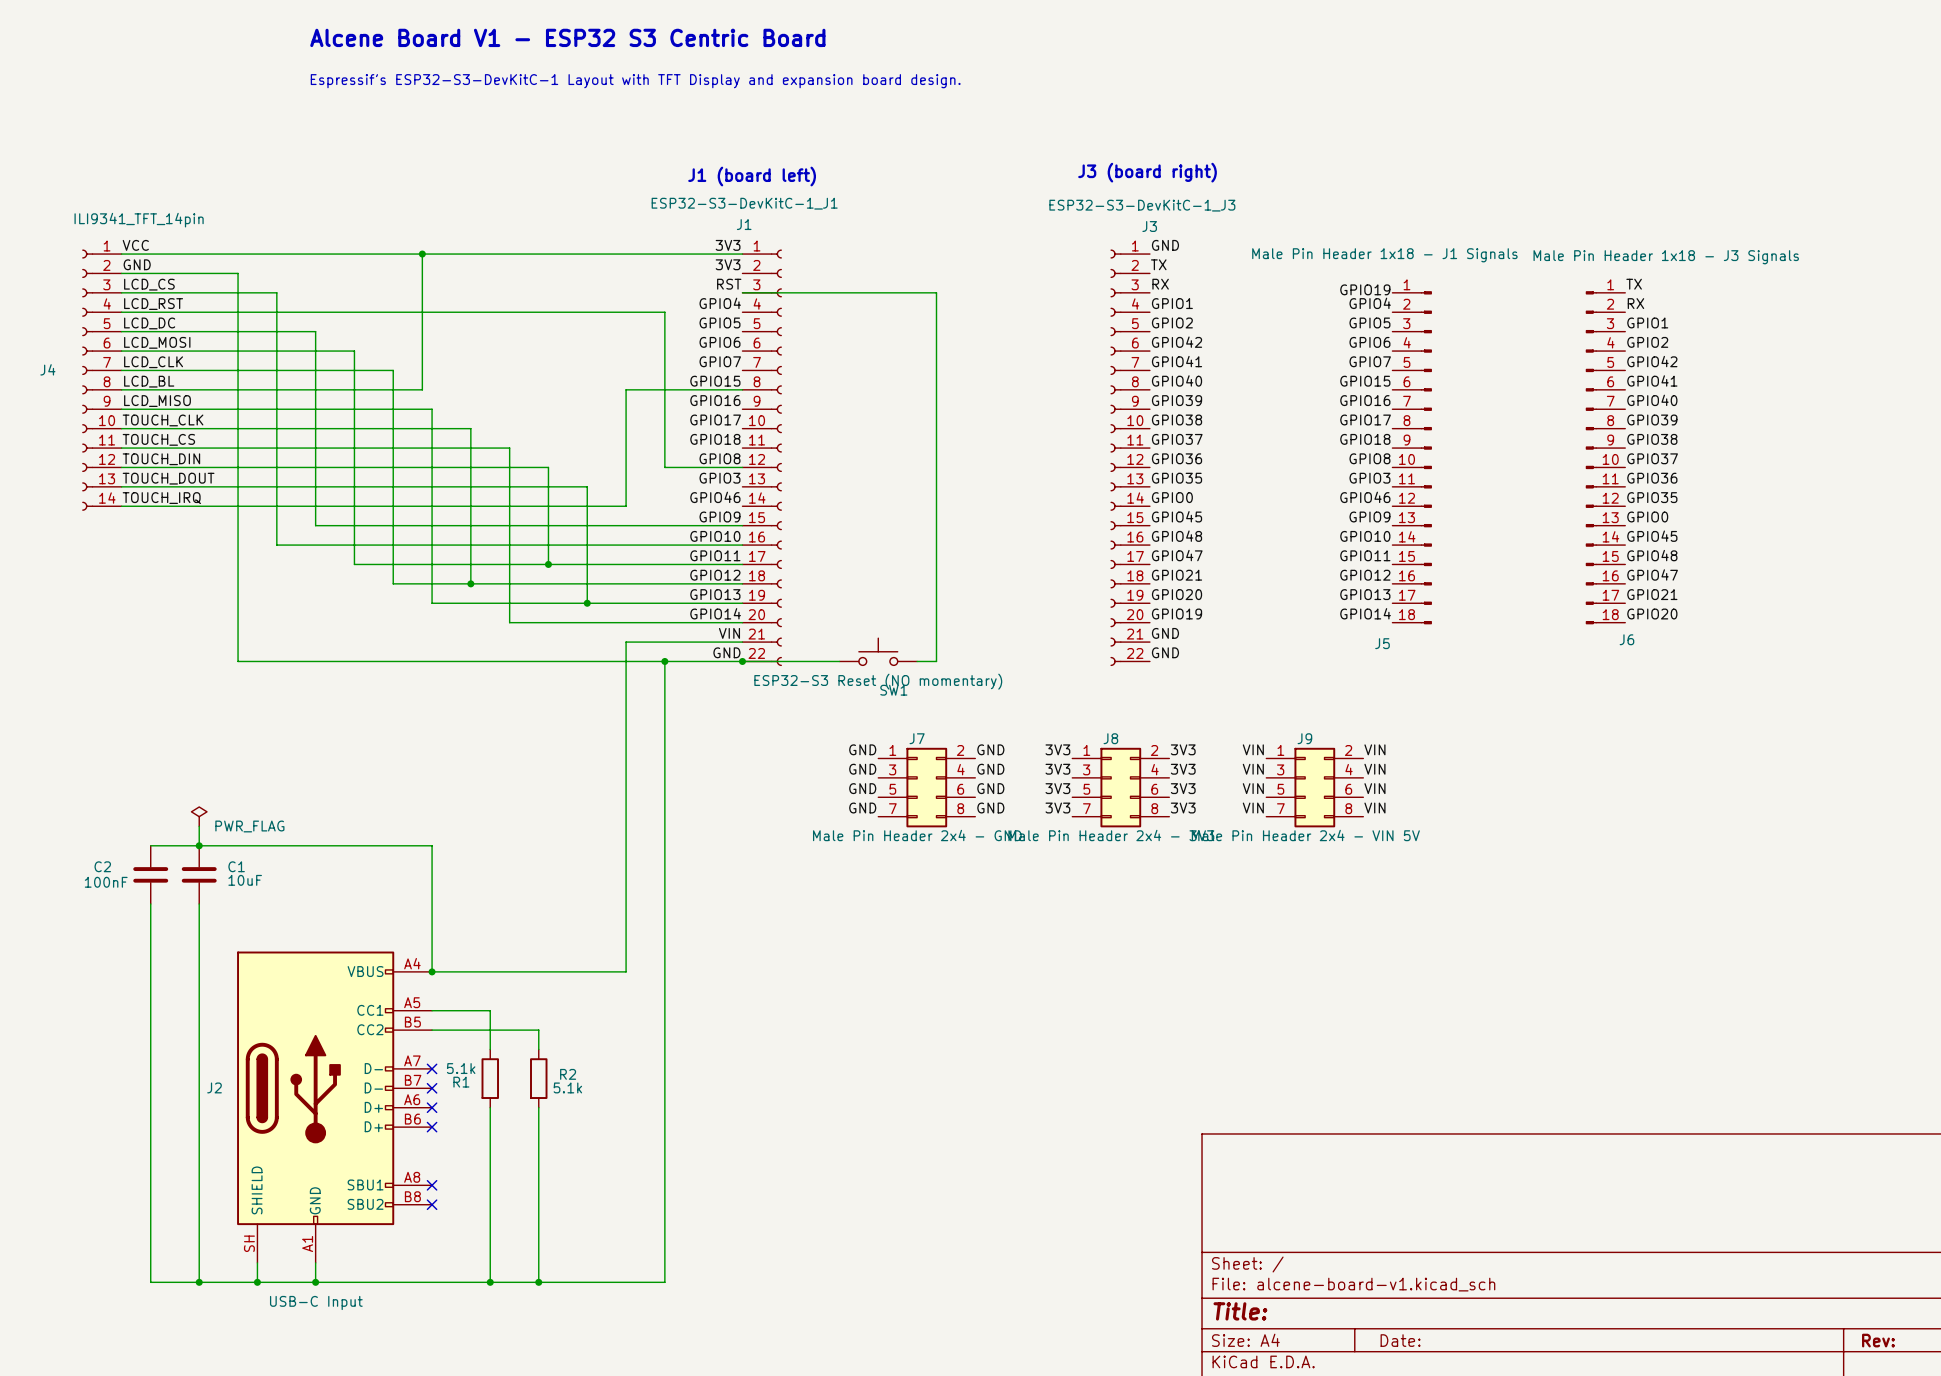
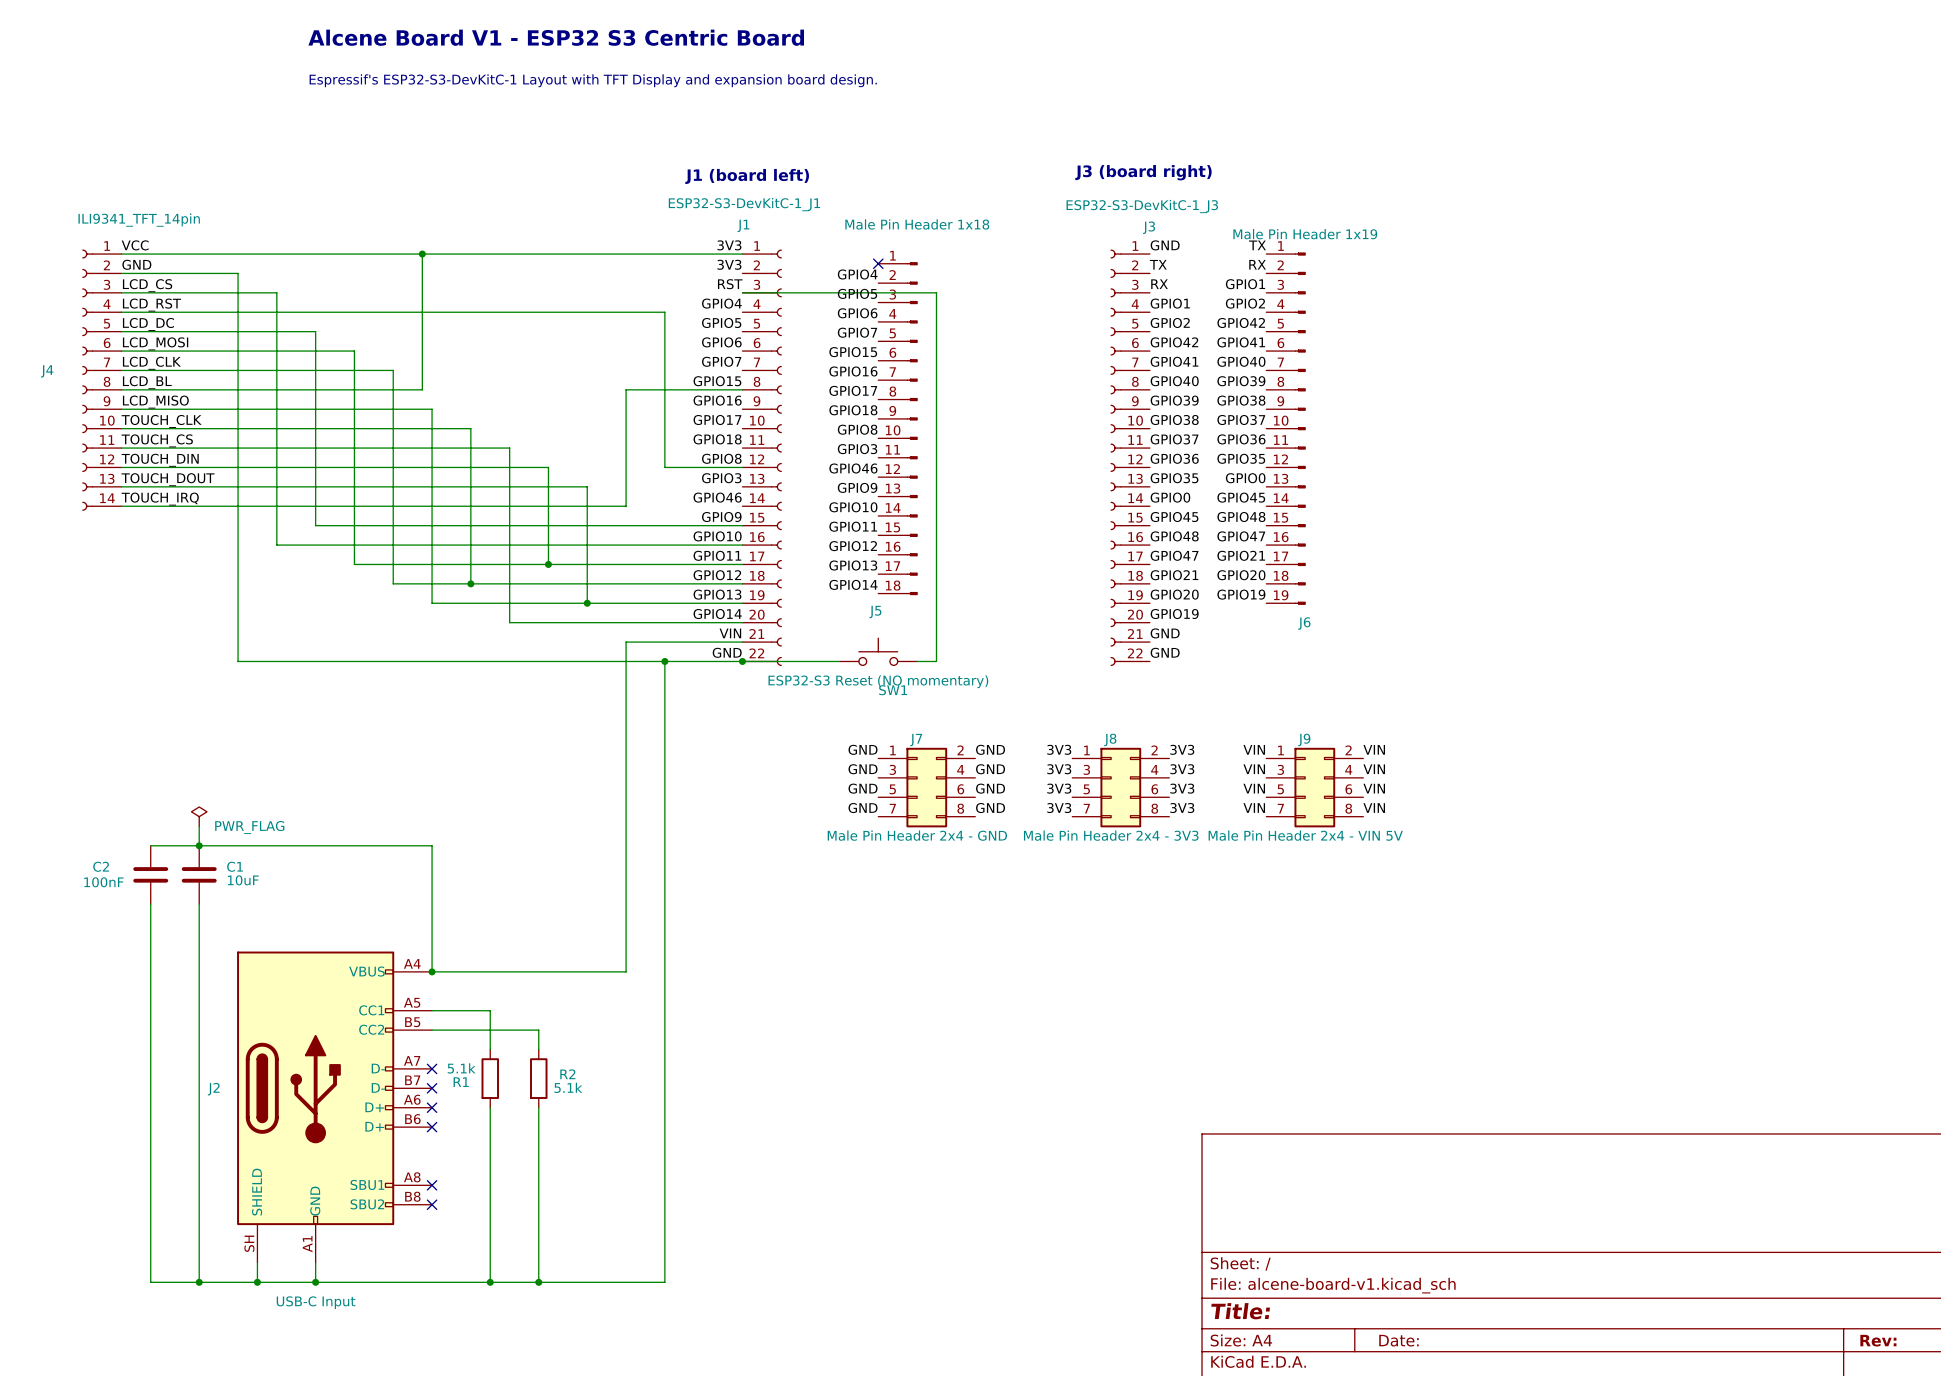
label: none -> TX (1257, 245)
J5 value: Male Pin Header 1x18 - J1 Signals (1384, 255) -> Male Pin Header 1x18 (917, 224)
J6 value: Male Pin Header 1x18 - J3 Signals (1666, 257) -> Male Pin Header 1x19 (1305, 234)
no-connect mark: none -> (878, 263)
label: none -> RX (1257, 264)
label: none -> GPIO4 (857, 274)
label: none -> GPIO1 (1245, 284)
label: TX (1634, 284) -> none
label: GPIO19 (1365, 289) -> none
J6 symbol: [1585, 291, 1626, 625] -> [1266, 252, 1306, 605]
label: none -> GPIO5 (857, 293)
label: none -> GPIO2 (1245, 303)
label: GPIO4 (1370, 303) -> none
label: RX (1635, 303) -> none
label: none -> GPIO6 (857, 313)
label: none -> GPIO42 (1241, 322)
label: GPIO5 (1369, 322) -> none
label: GPIO1 (1647, 322) -> none
label: none -> GPIO7 (857, 332)
label: none -> GPIO41 (1241, 342)
label: GPIO6 (1369, 342) -> none
label: GPIO2 (1647, 342) -> none
label: none -> GPIO15 (853, 352)
label: none -> GPIO40 (1241, 361)
label: GPIO7 (1370, 361) -> none
label: GPIO42 (1652, 361) -> none
label: none -> GPIO16 (853, 371)
label: GPIO41 (1652, 380) -> none
label: none -> GPIO39 (1241, 381)
label: GPIO15 (1365, 381) -> none
label: none -> GPIO17 (853, 390)
label: none -> GPIO38 (1241, 400)
label: GPIO16 (1365, 400) -> none
label: GPIO40 (1652, 400) -> none
label: none -> GPIO18 (853, 410)
label: none -> GPIO37 (1241, 420)
label: GPIO17 (1365, 419) -> none
label: GPIO39 (1652, 419) -> none
label: none -> GPIO8 (857, 429)
label: none -> GPIO36 (1241, 439)
label: GPIO18 (1365, 439) -> none
label: GPIO38 (1652, 439) -> none
label: none -> GPIO3 (857, 449)
J5 position: (1412, 457) -> (897, 428)
label: none -> GPIO35 (1241, 458)
label: GPIO8 (1369, 458) -> none
label: GPIO37 (1652, 458) -> none
label: none -> GPIO46 (853, 468)
label: none -> GPIO0 (1245, 478)
label: GPIO3 (1369, 478) -> none
label: GPIO36 (1652, 478) -> none
label: none -> GPIO9 (857, 487)
label: none -> GPIO45 (1241, 497)
label: GPIO46 (1365, 497) -> none
label: GPIO35 (1652, 497) -> none
label: none -> GPIO10 (853, 507)
label: none -> GPIO48 (1241, 517)
label: GPIO9 (1369, 517) -> none
label: GPIO0 (1647, 517) -> none
label: none -> GPIO11 (853, 526)
label: none -> GPIO47 (1241, 536)
label: GPIO10 (1365, 536) -> none
label: GPIO45 (1652, 536) -> none
label: none -> GPIO12 (853, 546)
label: none -> GPIO21 (1241, 555)
label: GPIO11 (1365, 555) -> none
label: GPIO48 (1652, 555) -> none
label: none -> GPIO13 (853, 565)
label: GPIO47 (1652, 574) -> none
label: none -> GPIO20 (1241, 575)
label: GPIO12 (1365, 575) -> none
label: none -> GPIO14 (853, 584)
label: none -> GPIO19 (1241, 594)
label: GPIO13 (1365, 594) -> none
label: GPIO21 (1652, 594) -> none
label: GPIO14 (1365, 613) -> none
label: GPIO20 (1652, 614) -> none
J5 name position: J5 (1382, 643) -> J5 (875, 611)

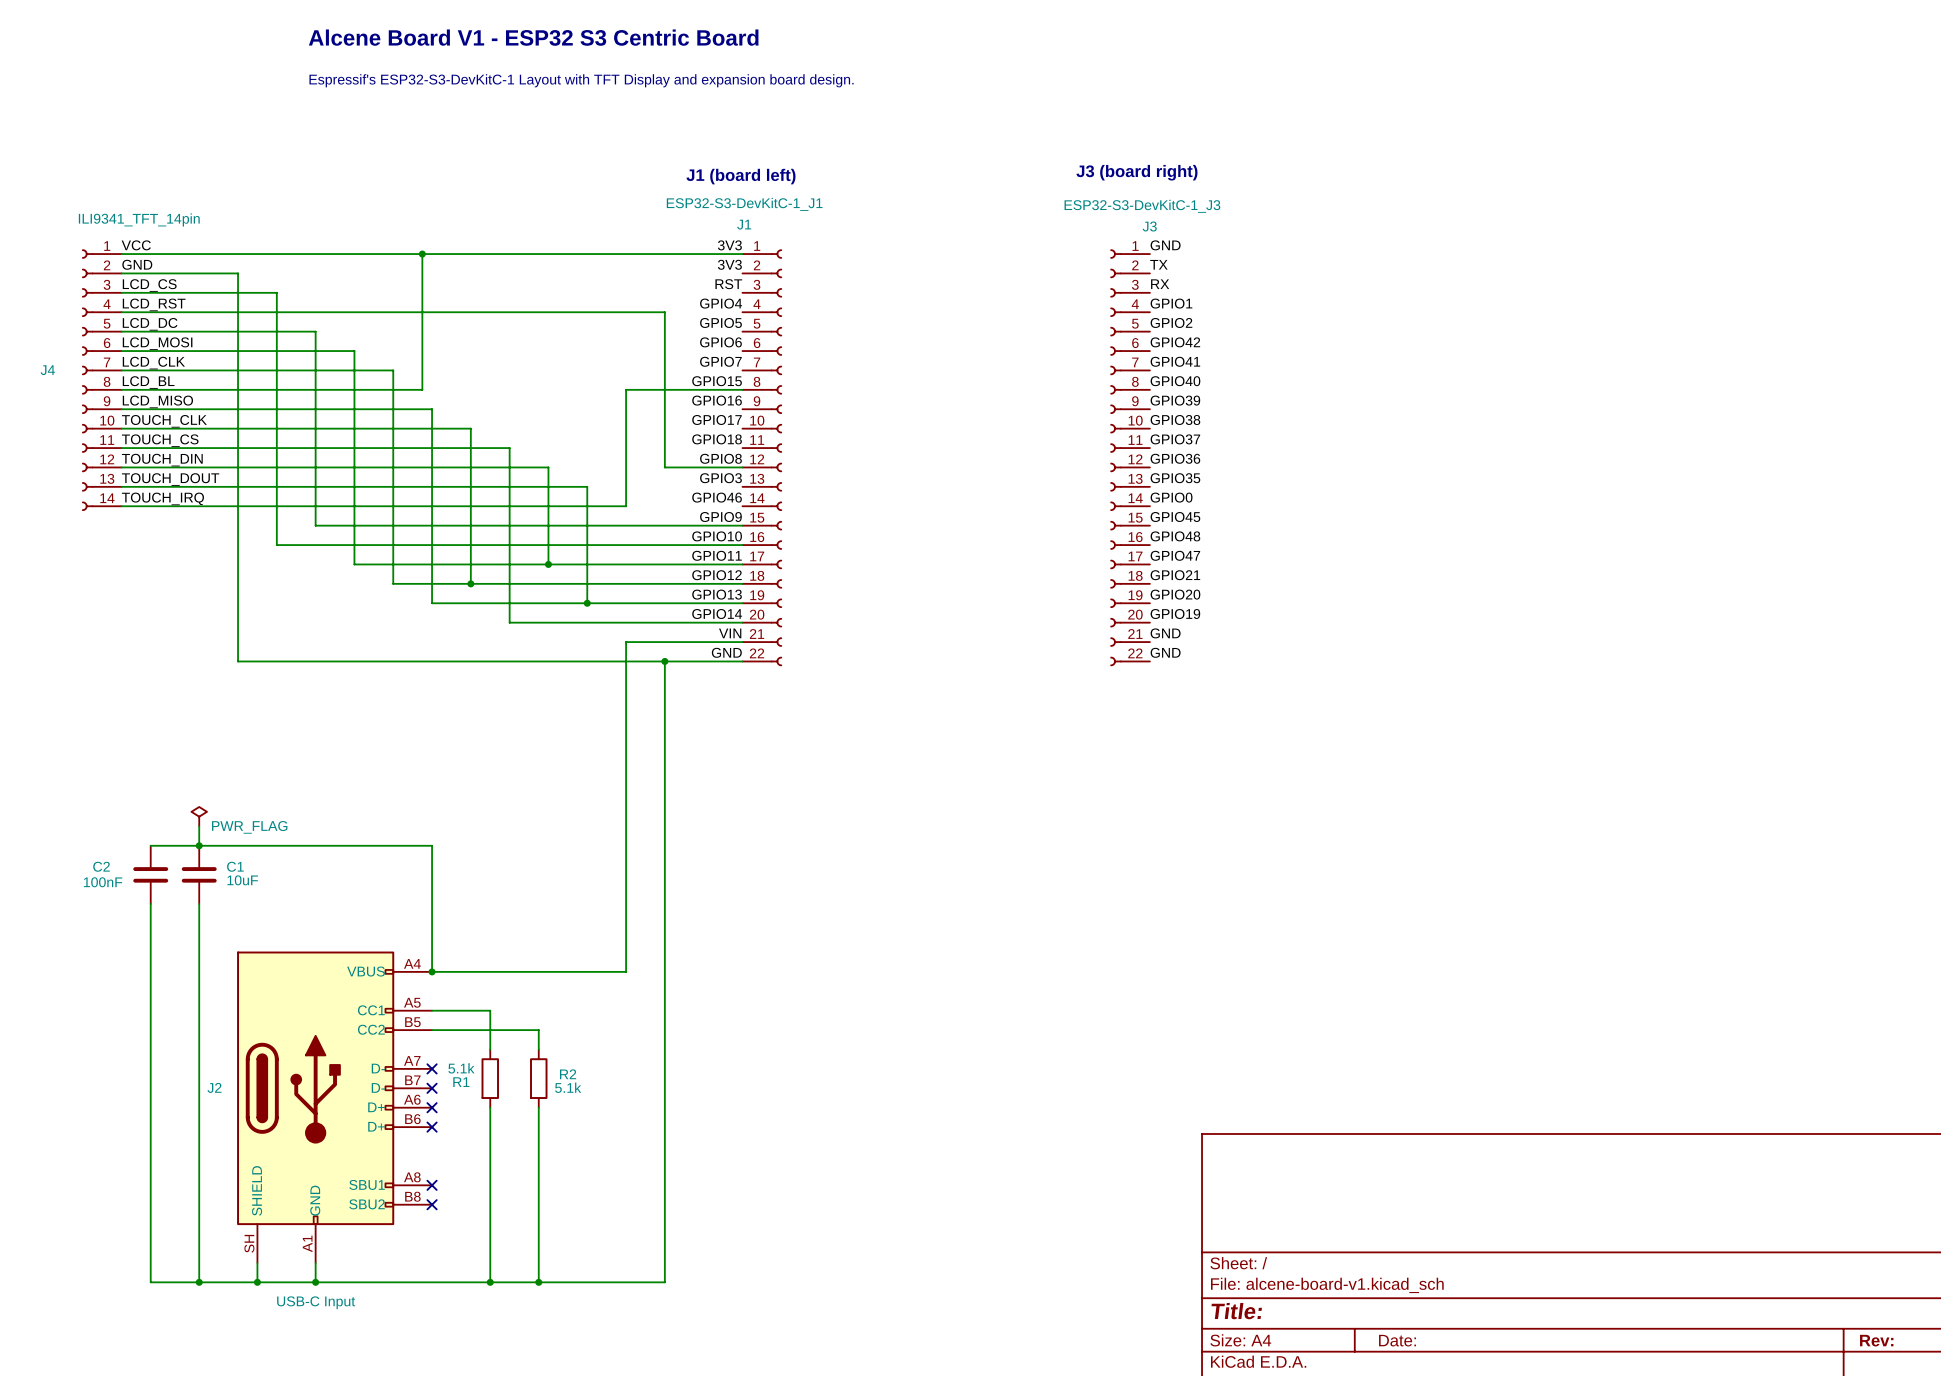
label: TX (1257, 245) -> none
no-connect mark: (878, 263) -> none
label: RX (1257, 264) -> none
label: GPIO4 (857, 274) -> none
label: GPIO1 (1245, 284) -> none
wire: (742, 292) (936, 292) (936, 661) (917, 661) -> none
label: GPIO5 (857, 293) -> none
label: GPIO2 (1245, 303) -> none
label: GPIO6 (857, 313) -> none
label: GPIO42 (1241, 322) -> none
label: GPIO7 (857, 332) -> none
label: GPIO41 (1241, 342) -> none
label: GPIO15 (853, 352) -> none
label: GPIO40 (1241, 361) -> none
label: GPIO16 (853, 371) -> none
label: GPIO39 (1241, 381) -> none
label: GPIO17 (853, 390) -> none
label: GPIO38 (1241, 400) -> none
label: GPIO18 (853, 410) -> none
label: GPIO37 (1241, 420) -> none
J5: Male Pin Header 1x18 (897, 428) -> none
J6: Male Pin Header 1x19 (1286, 428) -> none
label: GPIO8 (857, 429) -> none
label: GPIO36 (1241, 439) -> none
label: GPIO3 (857, 449) -> none
label: GPIO35 (1241, 458) -> none
label: GPIO46 (853, 468) -> none
label: GPIO0 (1245, 478) -> none
label: GPIO9 (857, 487) -> none
label: GPIO45 (1241, 497) -> none
label: GPIO10 (853, 507) -> none
label: GPIO48 (1241, 517) -> none
label: GPIO11 (853, 526) -> none
label: GPIO47 (1241, 536) -> none
label: GPIO12 (853, 546) -> none
label: GPIO21 (1241, 555) -> none
label: GPIO13 (853, 565) -> none
label: GPIO20 (1241, 575) -> none
label: GPIO14 (853, 584) -> none
label: GPIO19 (1241, 594) -> none
SW1: ESP32-S3 Reset (NO momentary) (878, 651) -> none
wire: (742, 661) (839, 661) -> none
junction: (742, 661) -> none
label: GND (863, 749) -> none
label: GND (990, 749) -> none
label: 3V3 (1059, 749) -> none
label: 3V3 (1182, 749) -> none
label: VIN (1254, 749) -> none
label: VIN (1374, 749) -> none
label: GND (863, 769) -> none
label: GND (990, 769) -> none
label: 3V3 (1059, 769) -> none
label: 3V3 (1182, 769) -> none
label: VIN (1254, 769) -> none
label: VIN (1374, 769) -> none
J7: Male Pin Header 2x4 - GND (926, 787) -> none
J8: Male Pin Header 2x4 - 3V3 (1120, 787) -> none
J9: Male Pin Header 2x4 - VIN 5V (1314, 787) -> none
label: GND (863, 788) -> none
label: GND (990, 788) -> none
label: 3V3 (1059, 788) -> none
label: 3V3 (1182, 788) -> none
label: VIN (1254, 788) -> none
label: VIN (1374, 788) -> none
label: GND (863, 808) -> none
label: GND (990, 808) -> none
label: 3V3 (1059, 808) -> none
label: 3V3 (1182, 808) -> none
label: VIN (1254, 808) -> none
label: VIN (1374, 808) -> none

